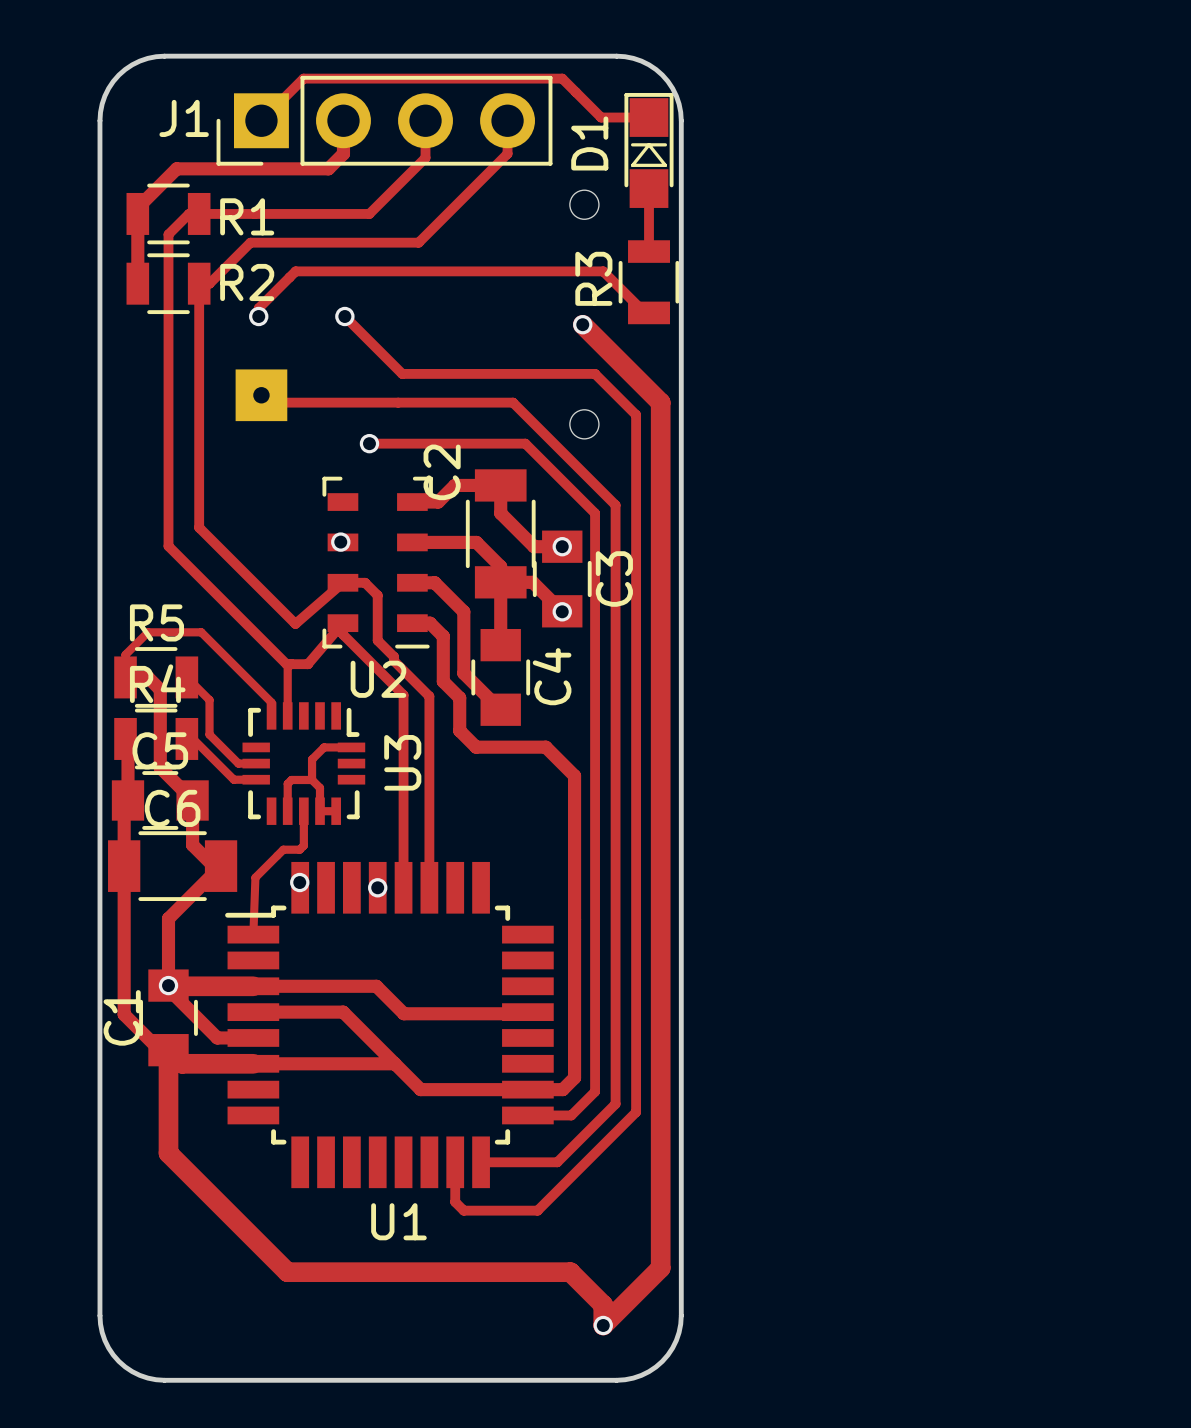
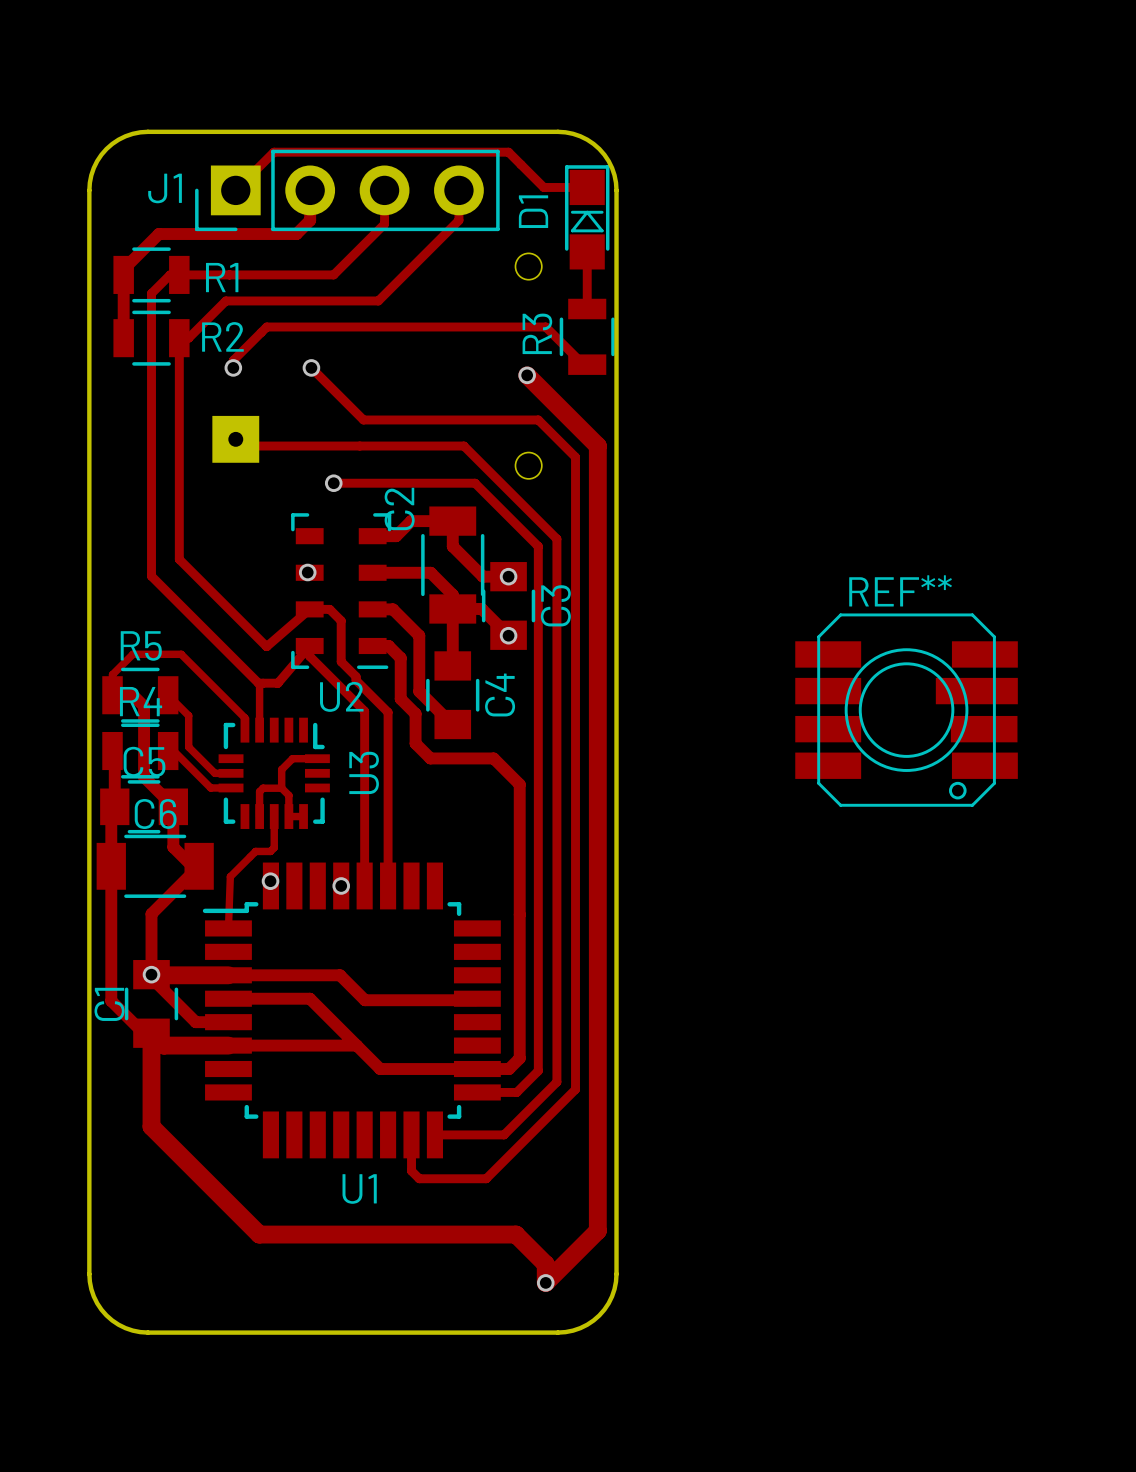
REF**: none -> (906, 710)

